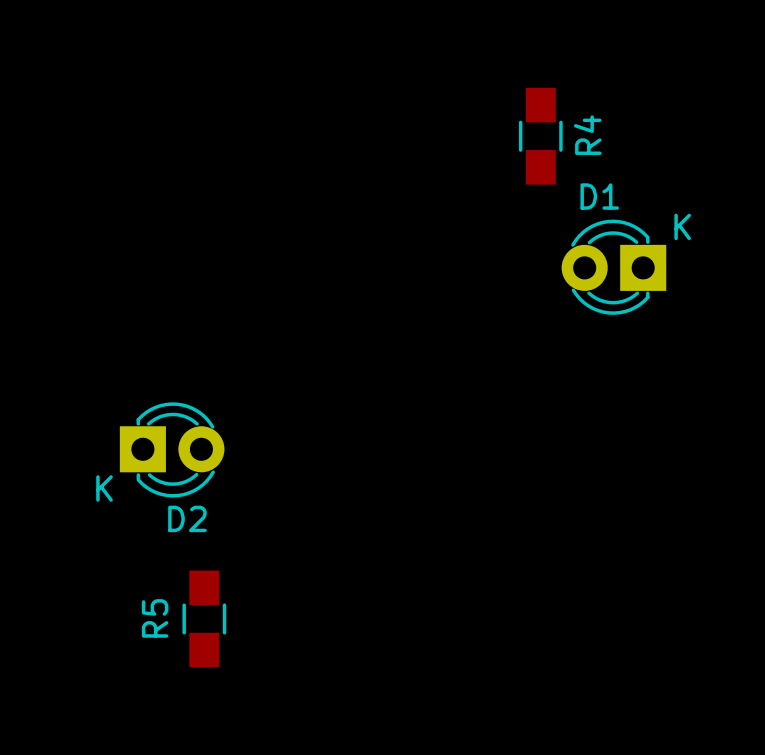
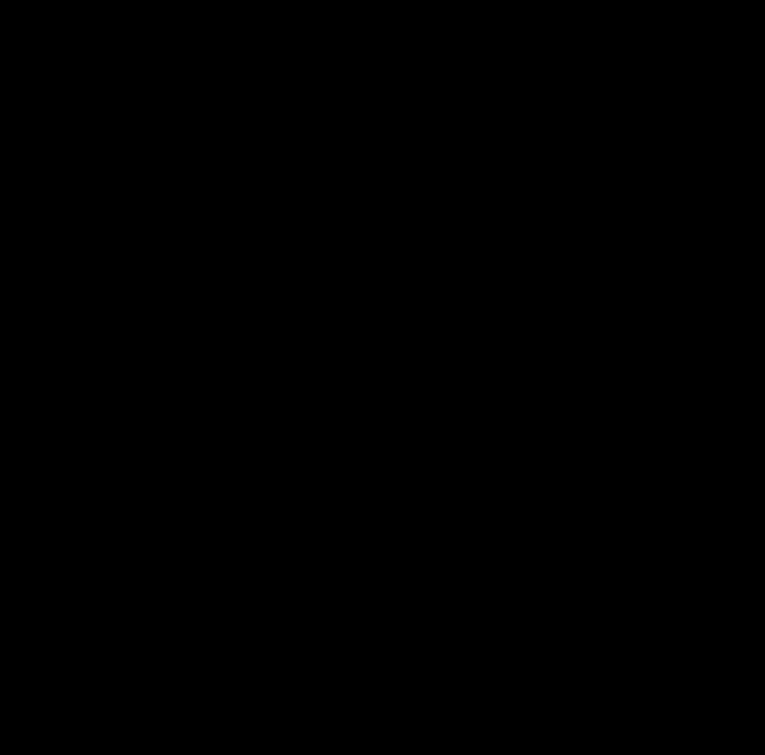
R4: (540, 136) -> none
D1: (613, 267) -> none
D2: (172, 449) -> none
R5: (204, 618) -> none

